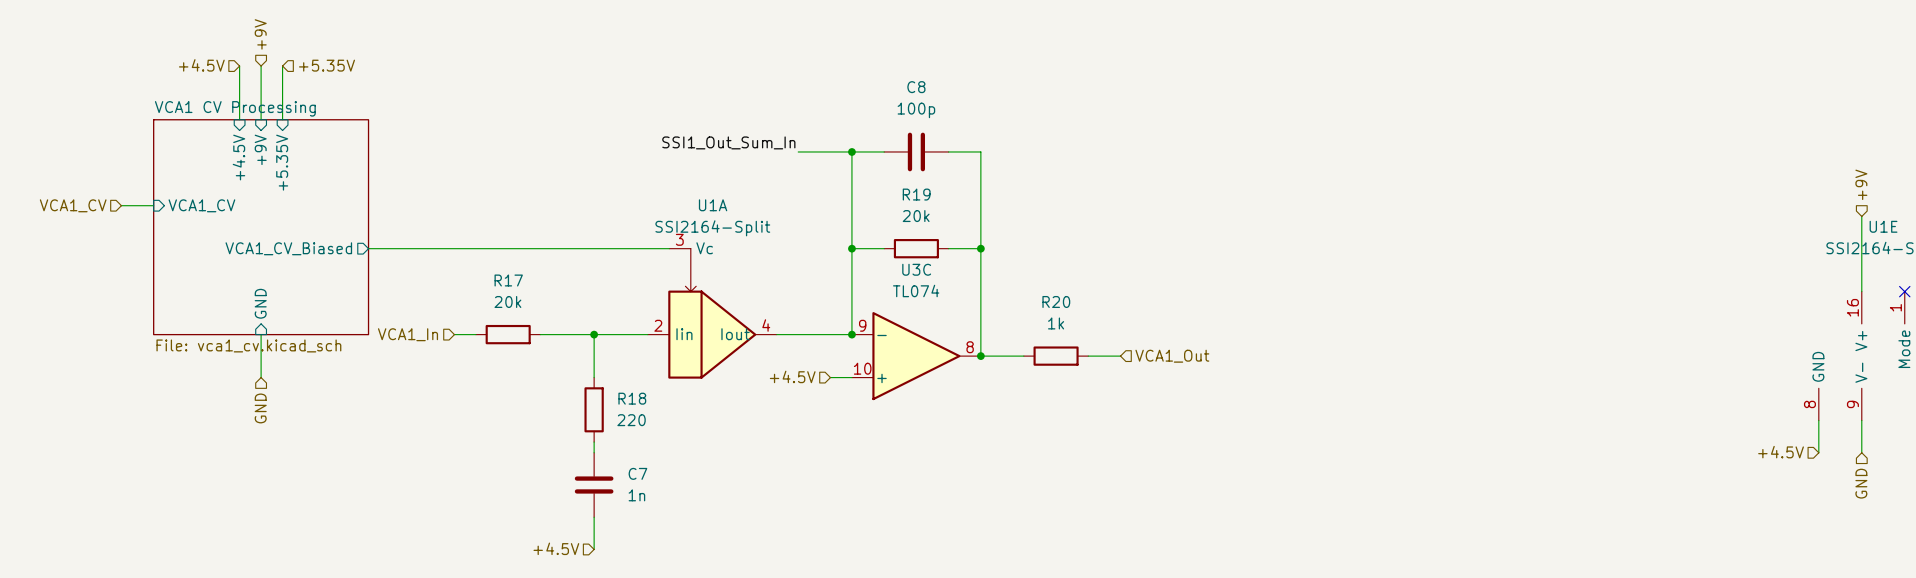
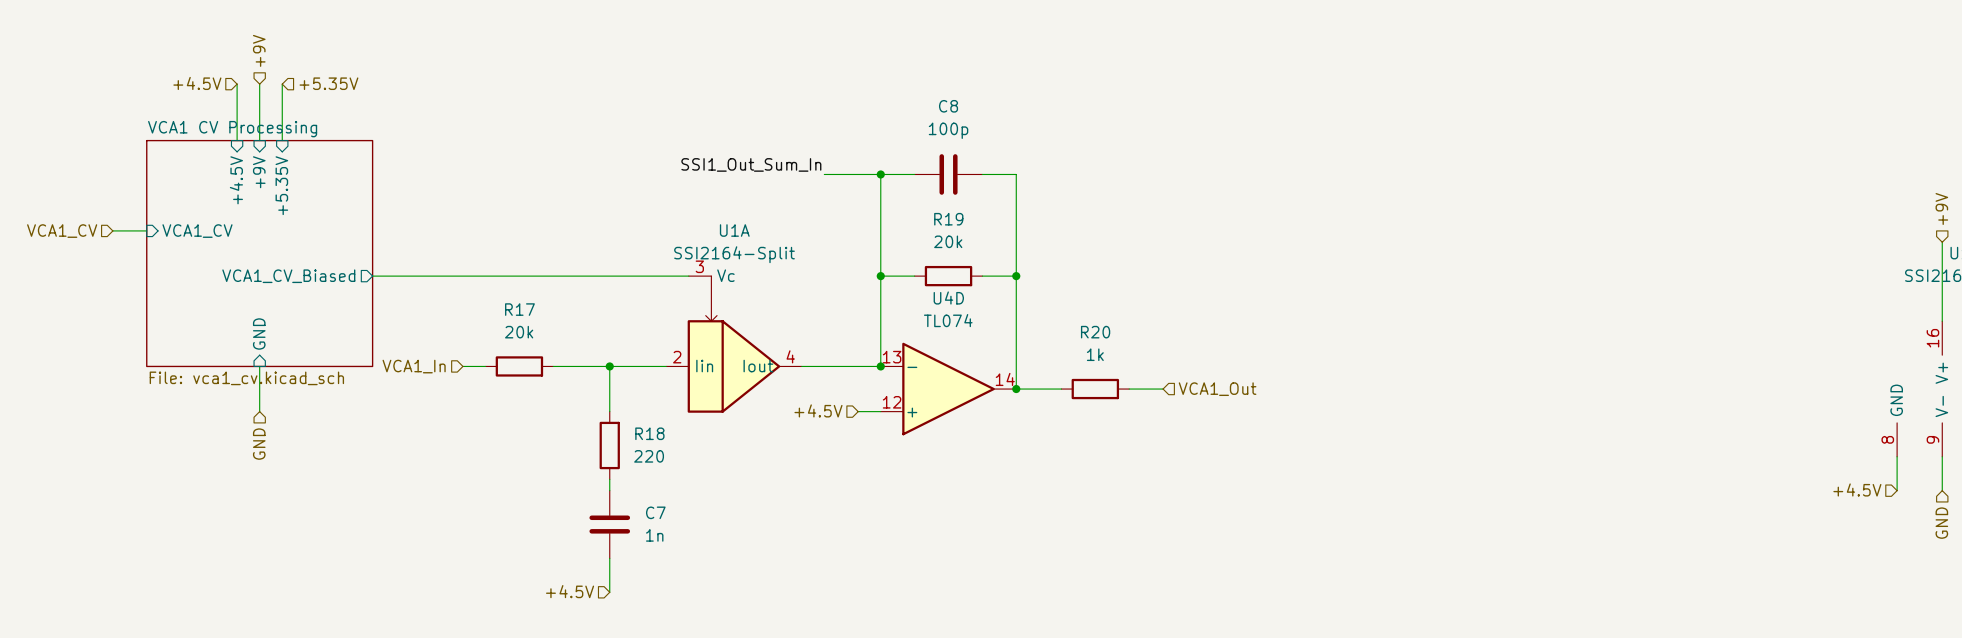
U3C name: U3C (916, 269) -> U4D (948, 298)
U3C pin number: 9 (862, 325) -> 13 (892, 357)
U3C pin number: 8 (970, 347) -> 14 (1005, 379)
U3C pin number: 10 (862, 368) -> 12 (892, 402)

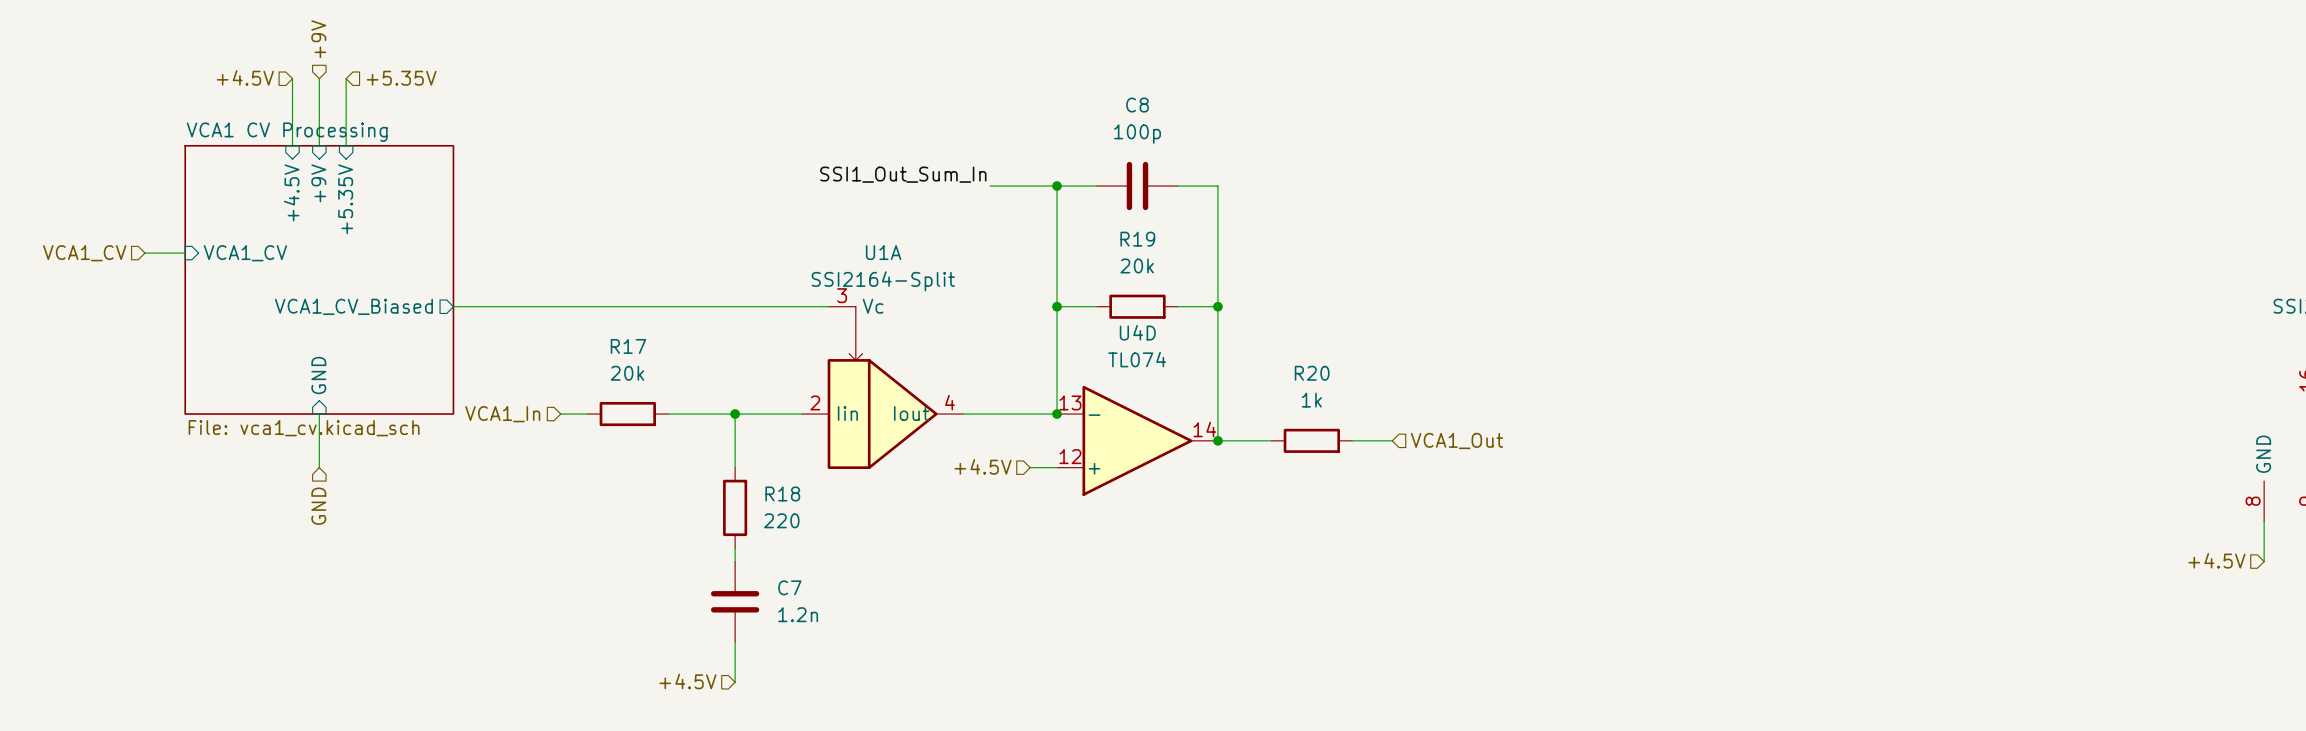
C7 value: 1n (654, 535) -> 1.2n (798, 614)

